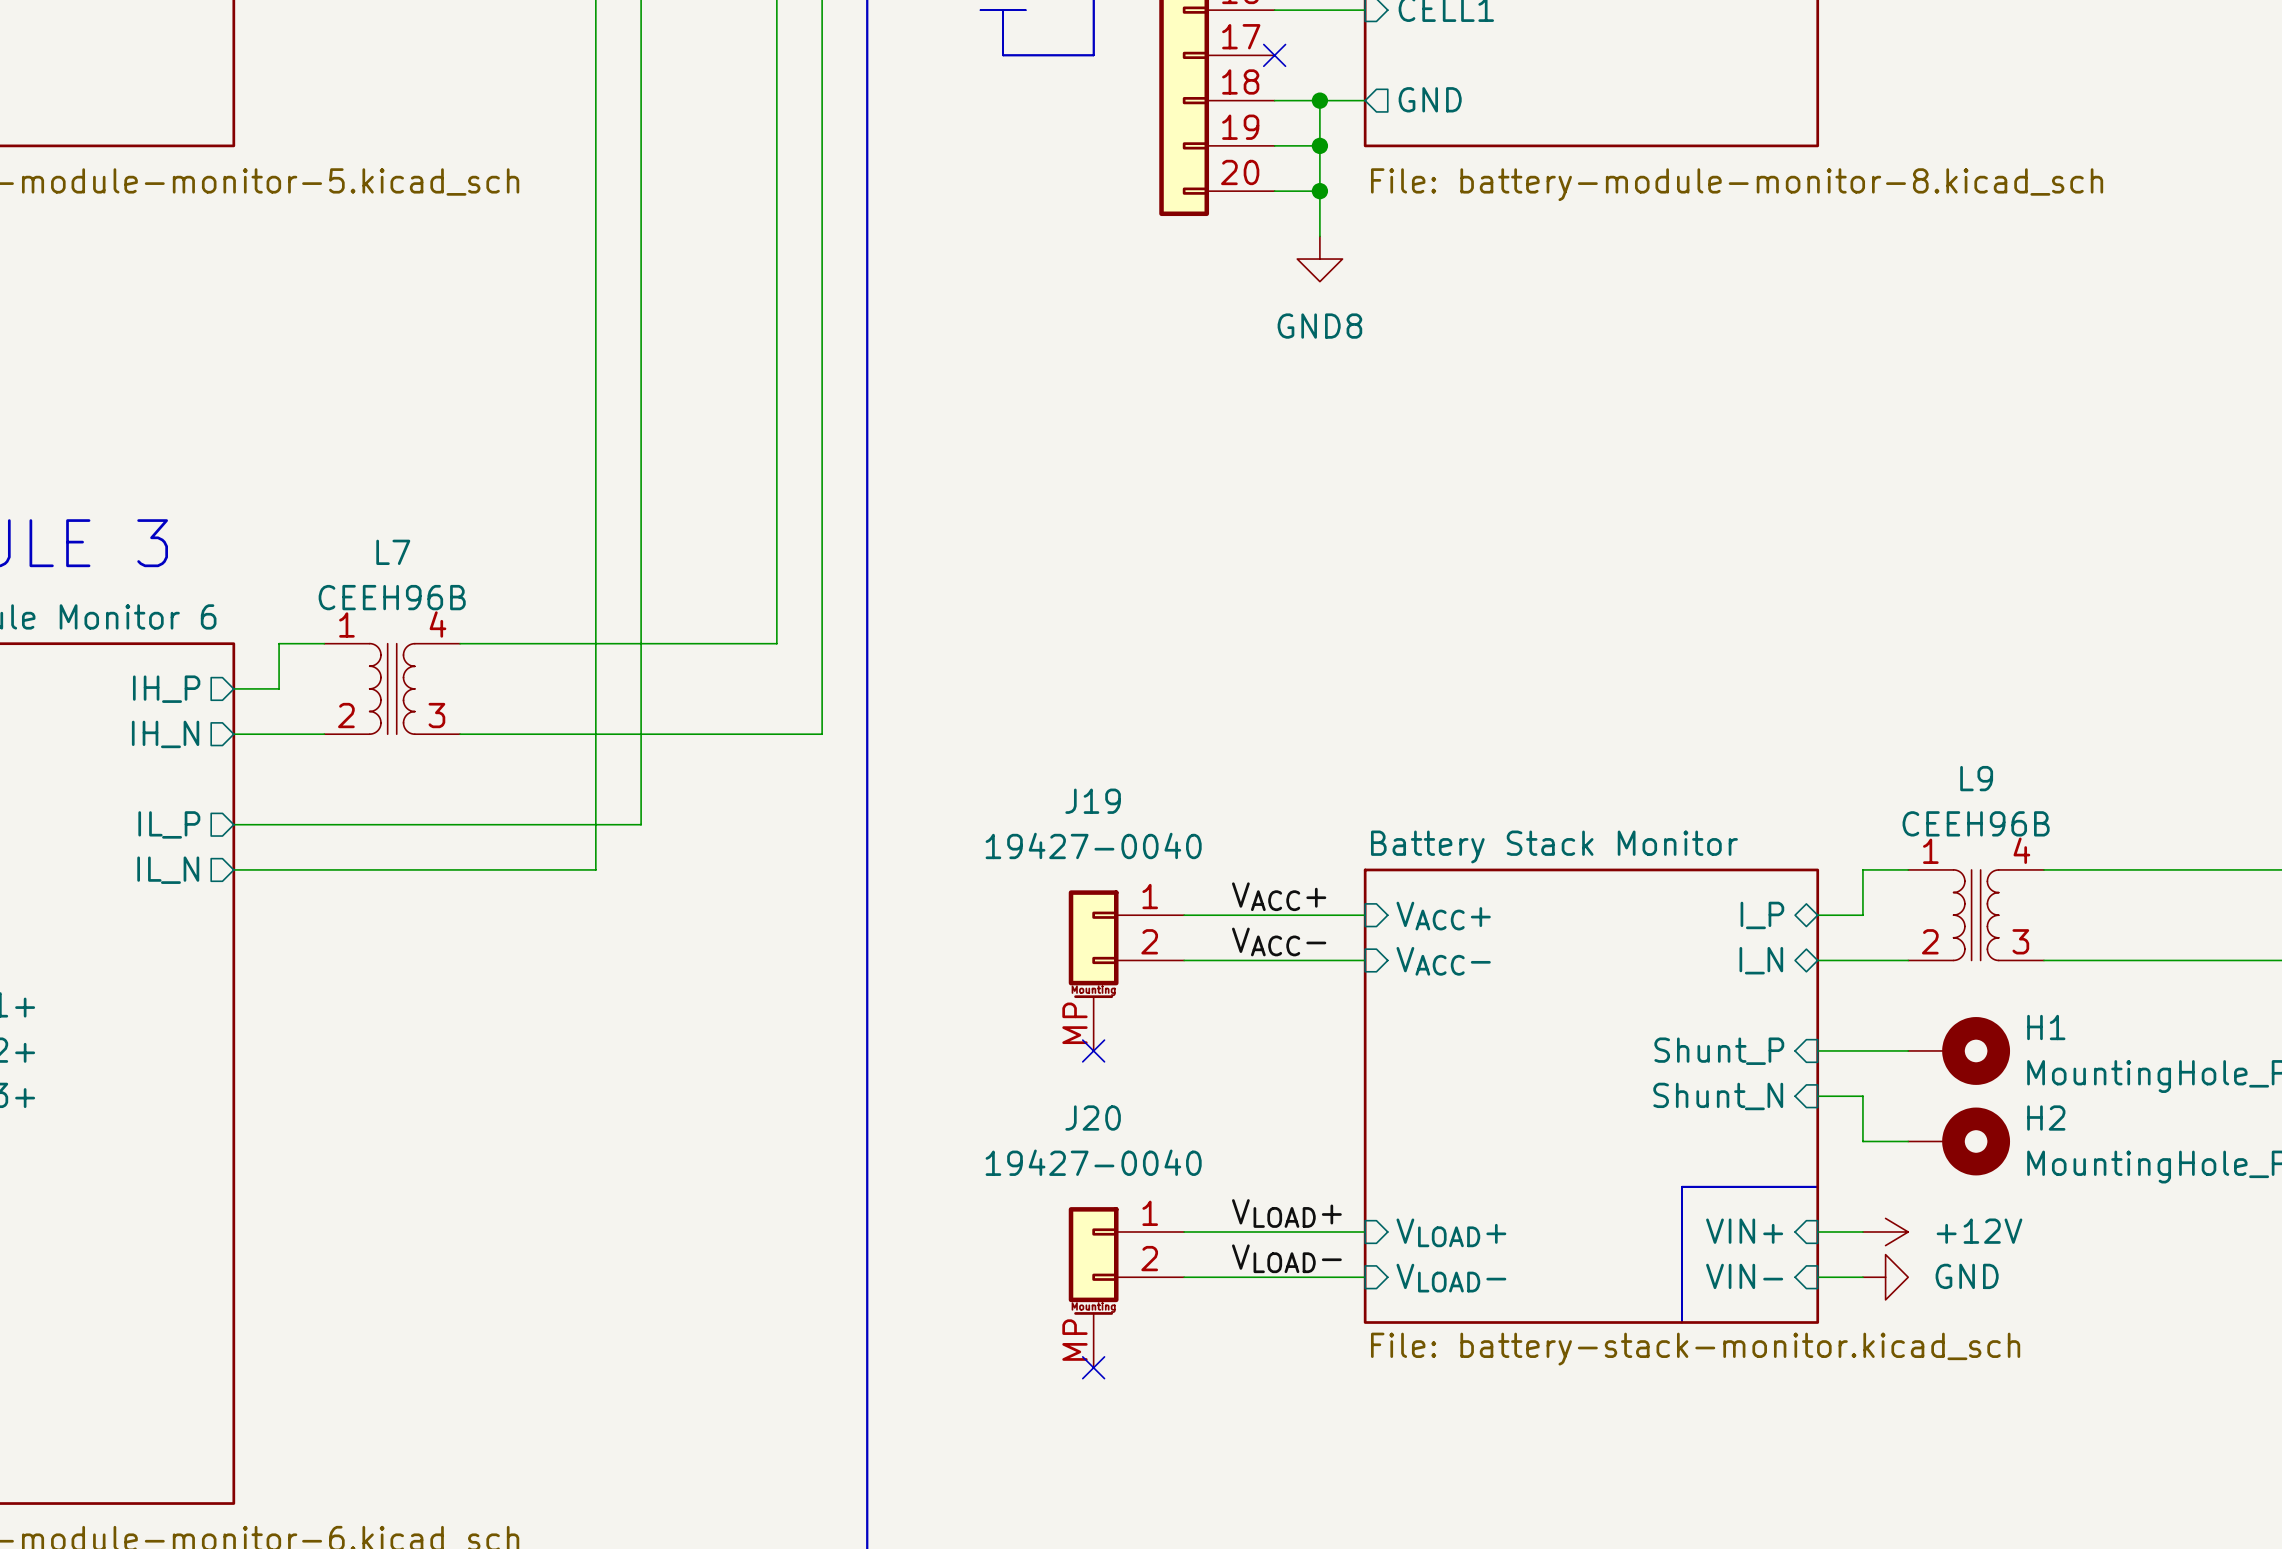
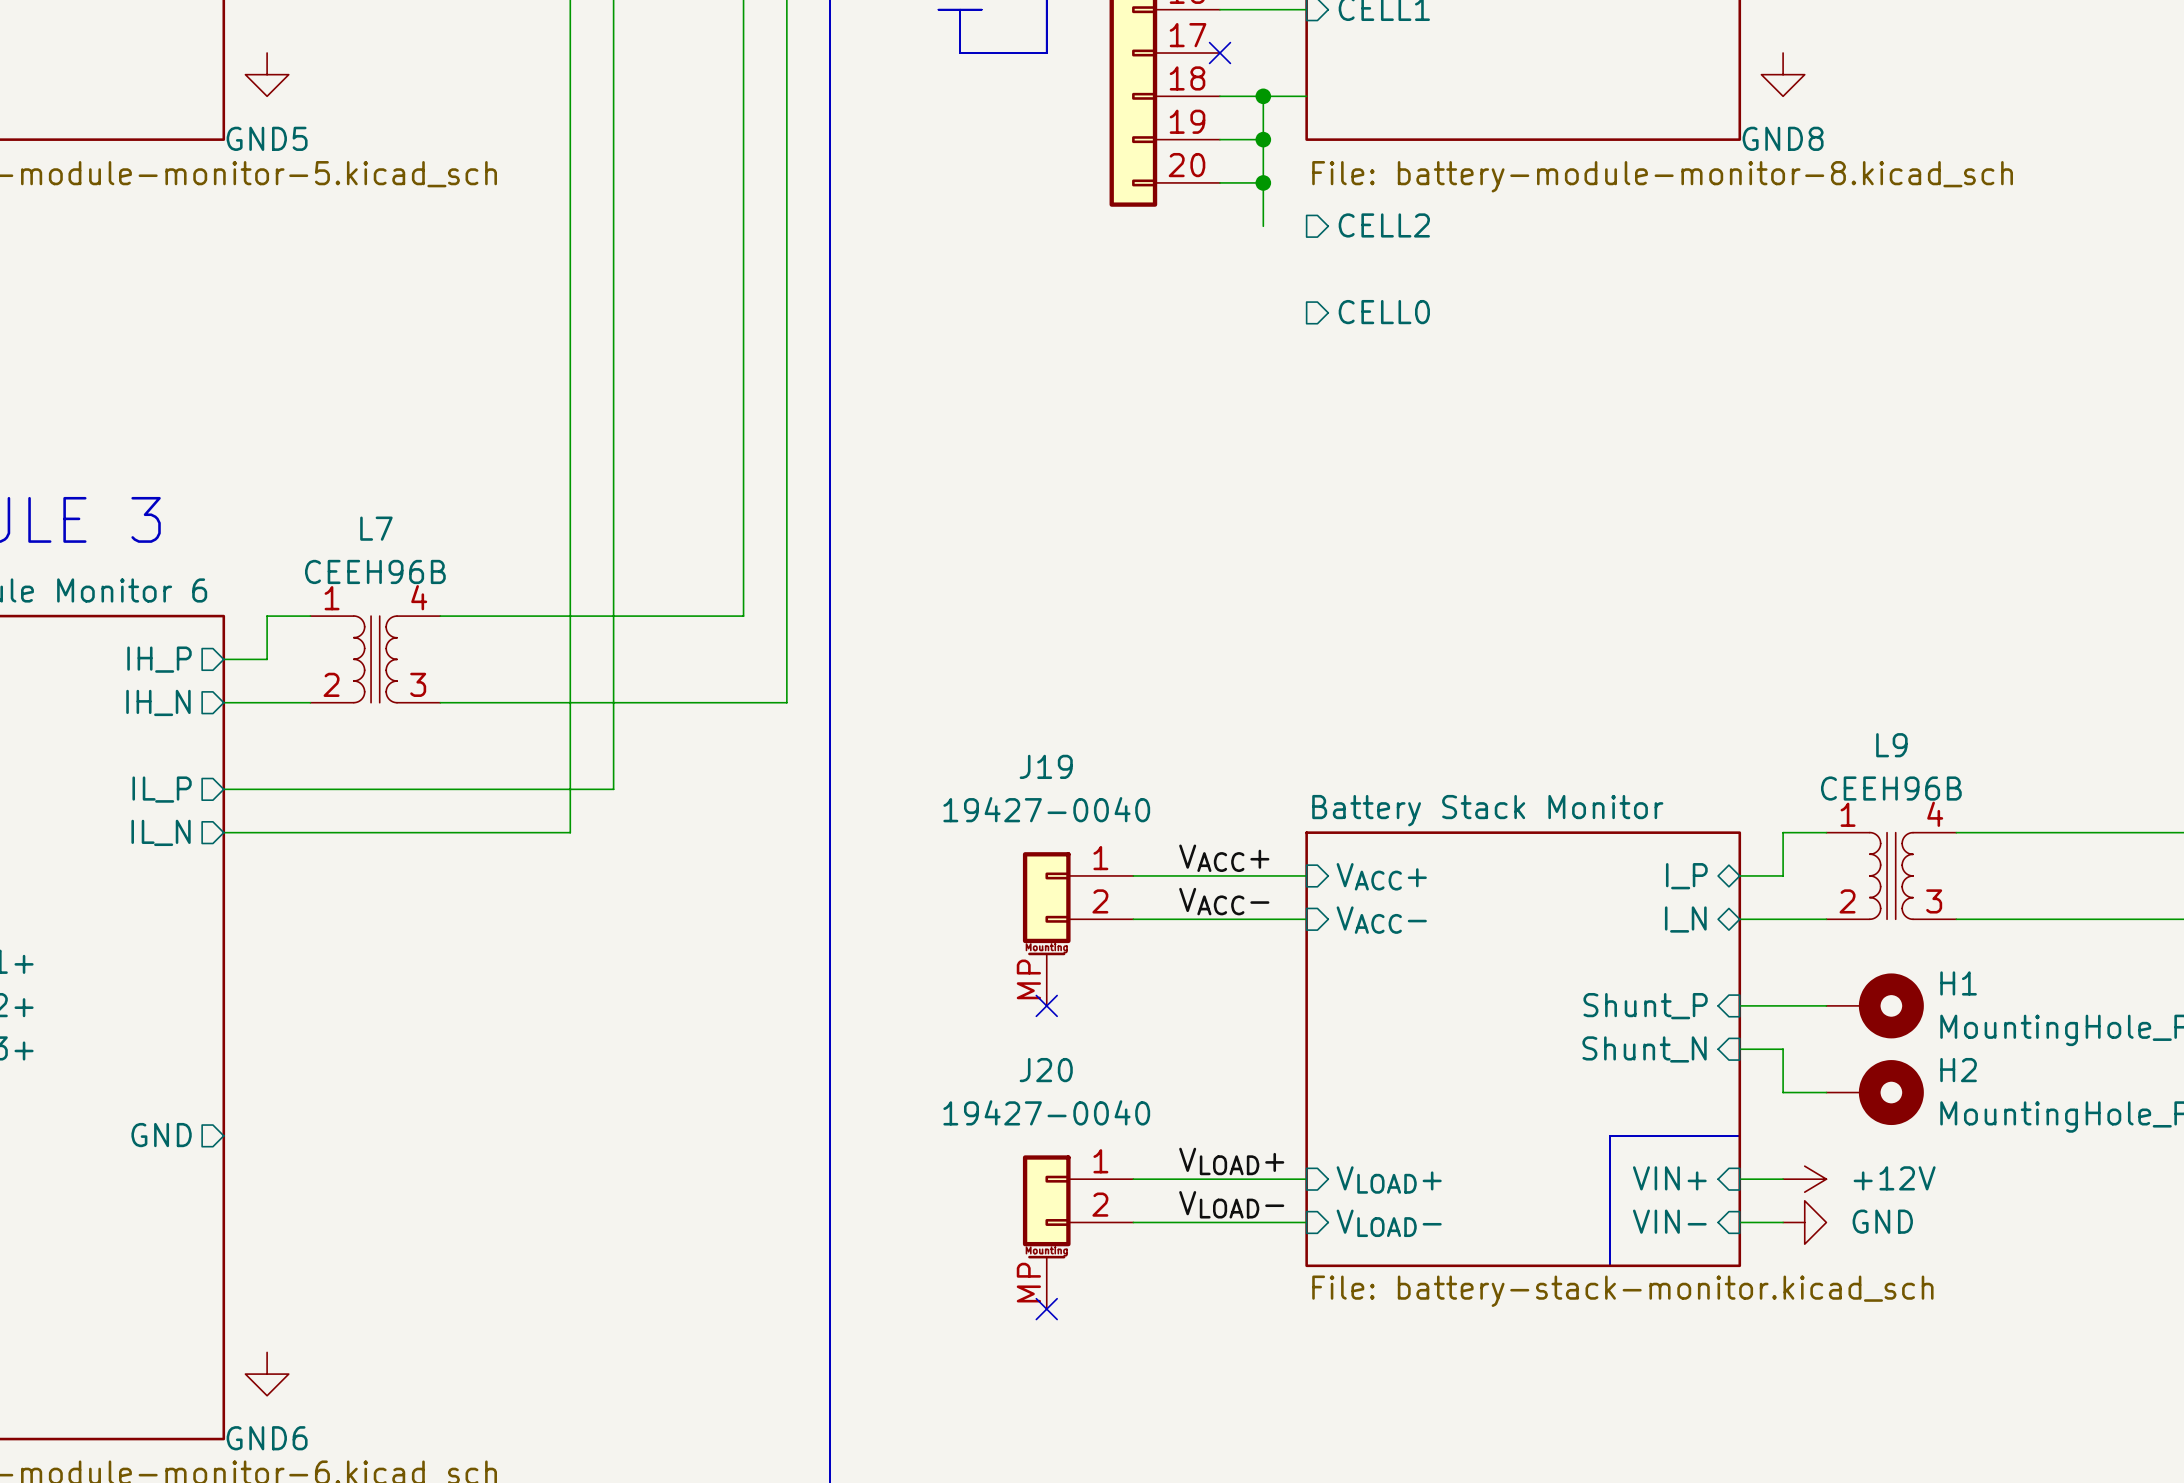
power symbol: none -> GND5 (267, 74)
power symbol: none -> GND8 (1783, 74)
sheet pin: GND (1430, 99) -> none
sheet pin: none -> CELL2 (1384, 225)
power symbol: GND8 (1319, 259) -> none
sheet pin: none -> CELL0 (1384, 312)
sheet pin: none -> GND (161, 1135)
power symbol: none -> GND6 (267, 1374)

